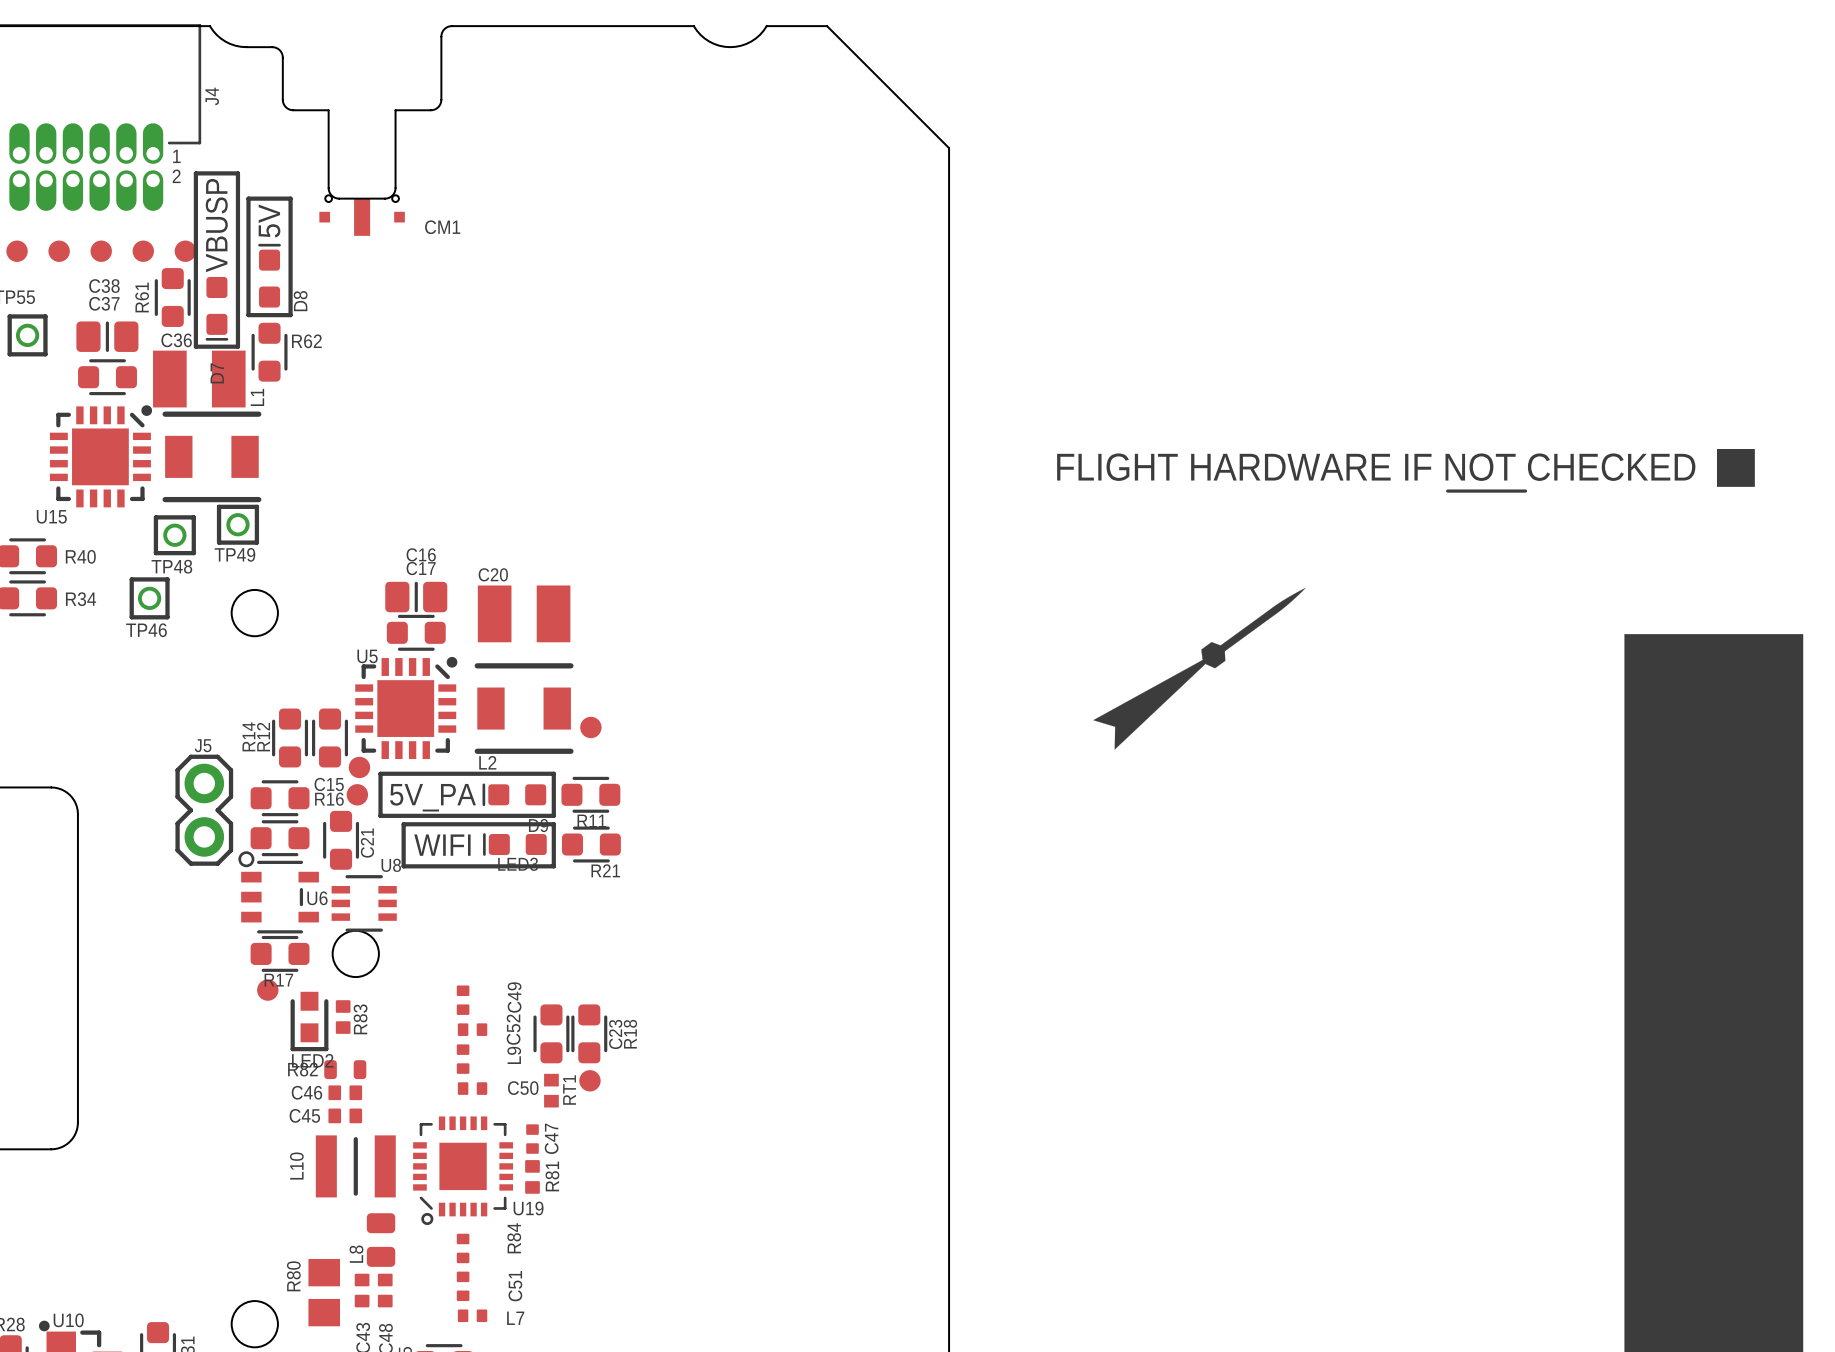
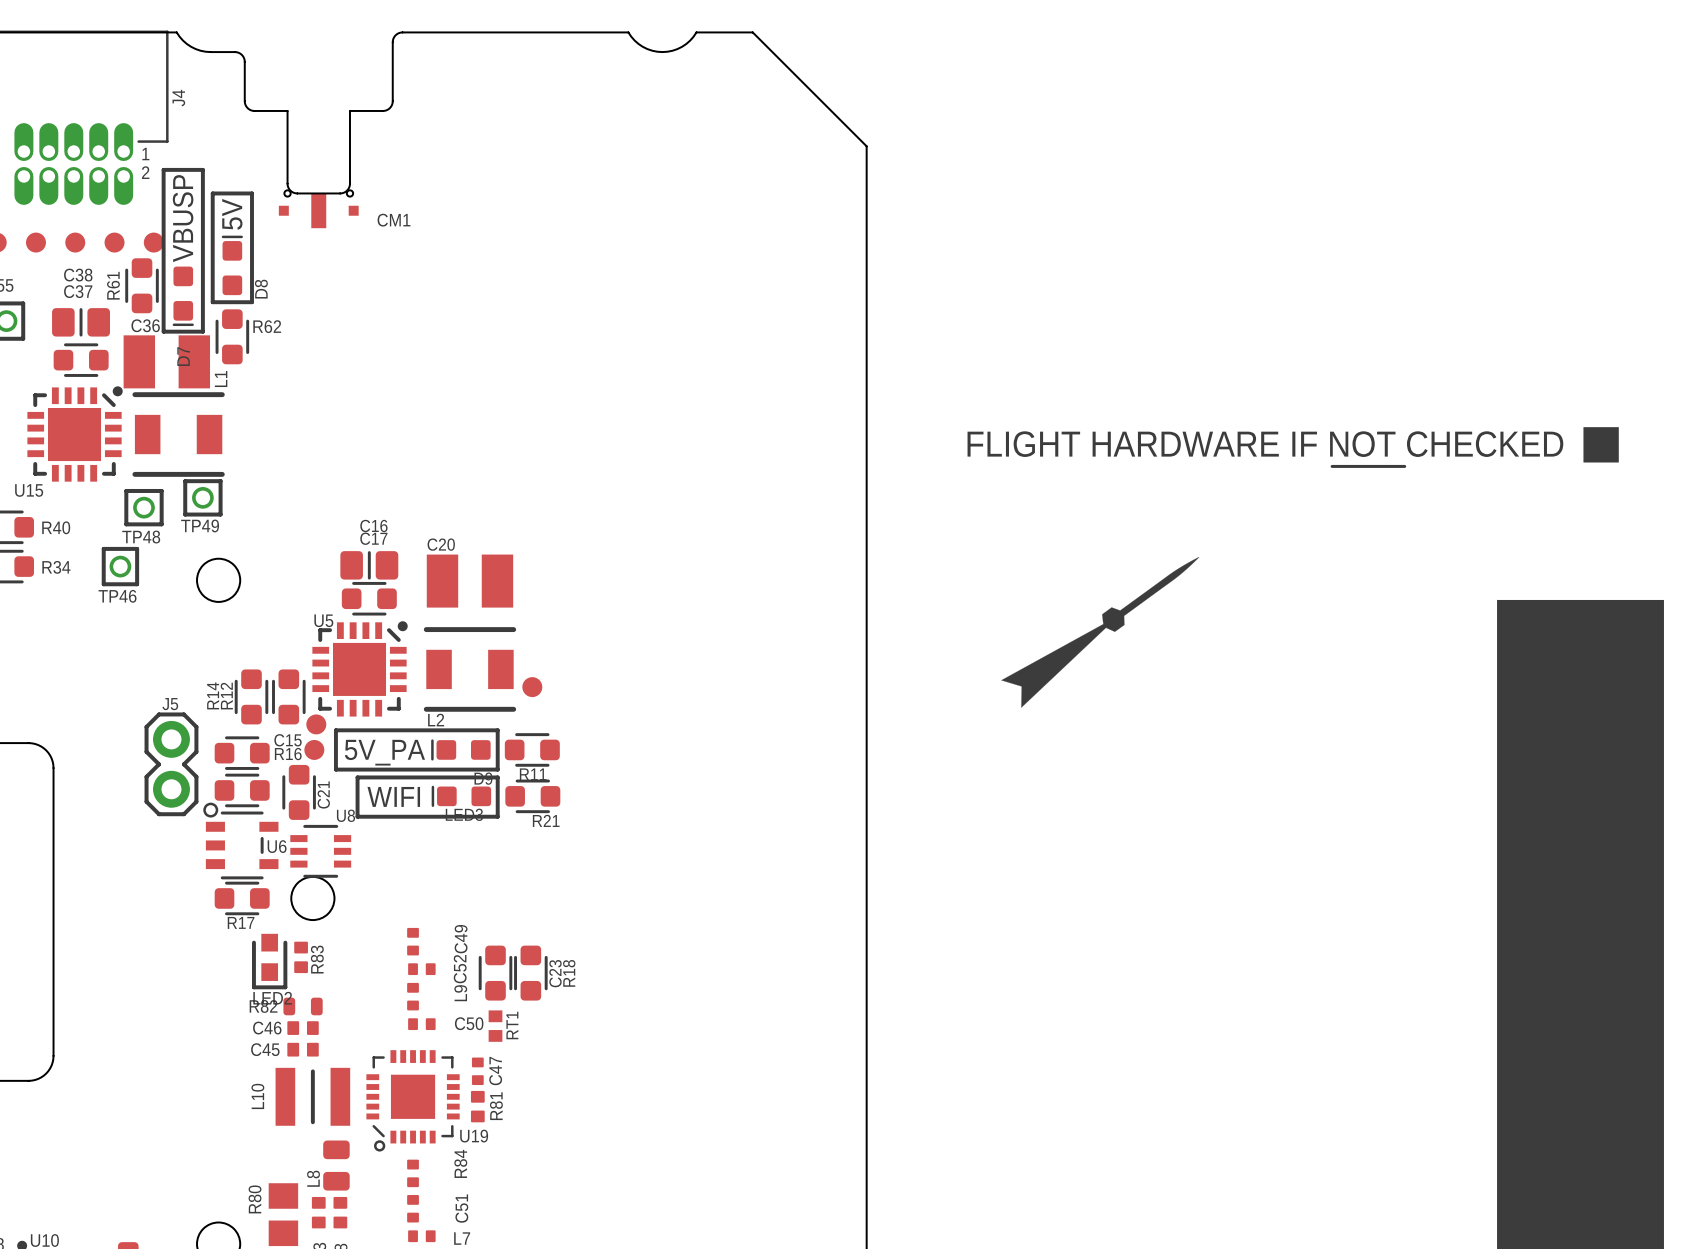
part: (267, 990) -> none
part: (589, 1080) -> none

